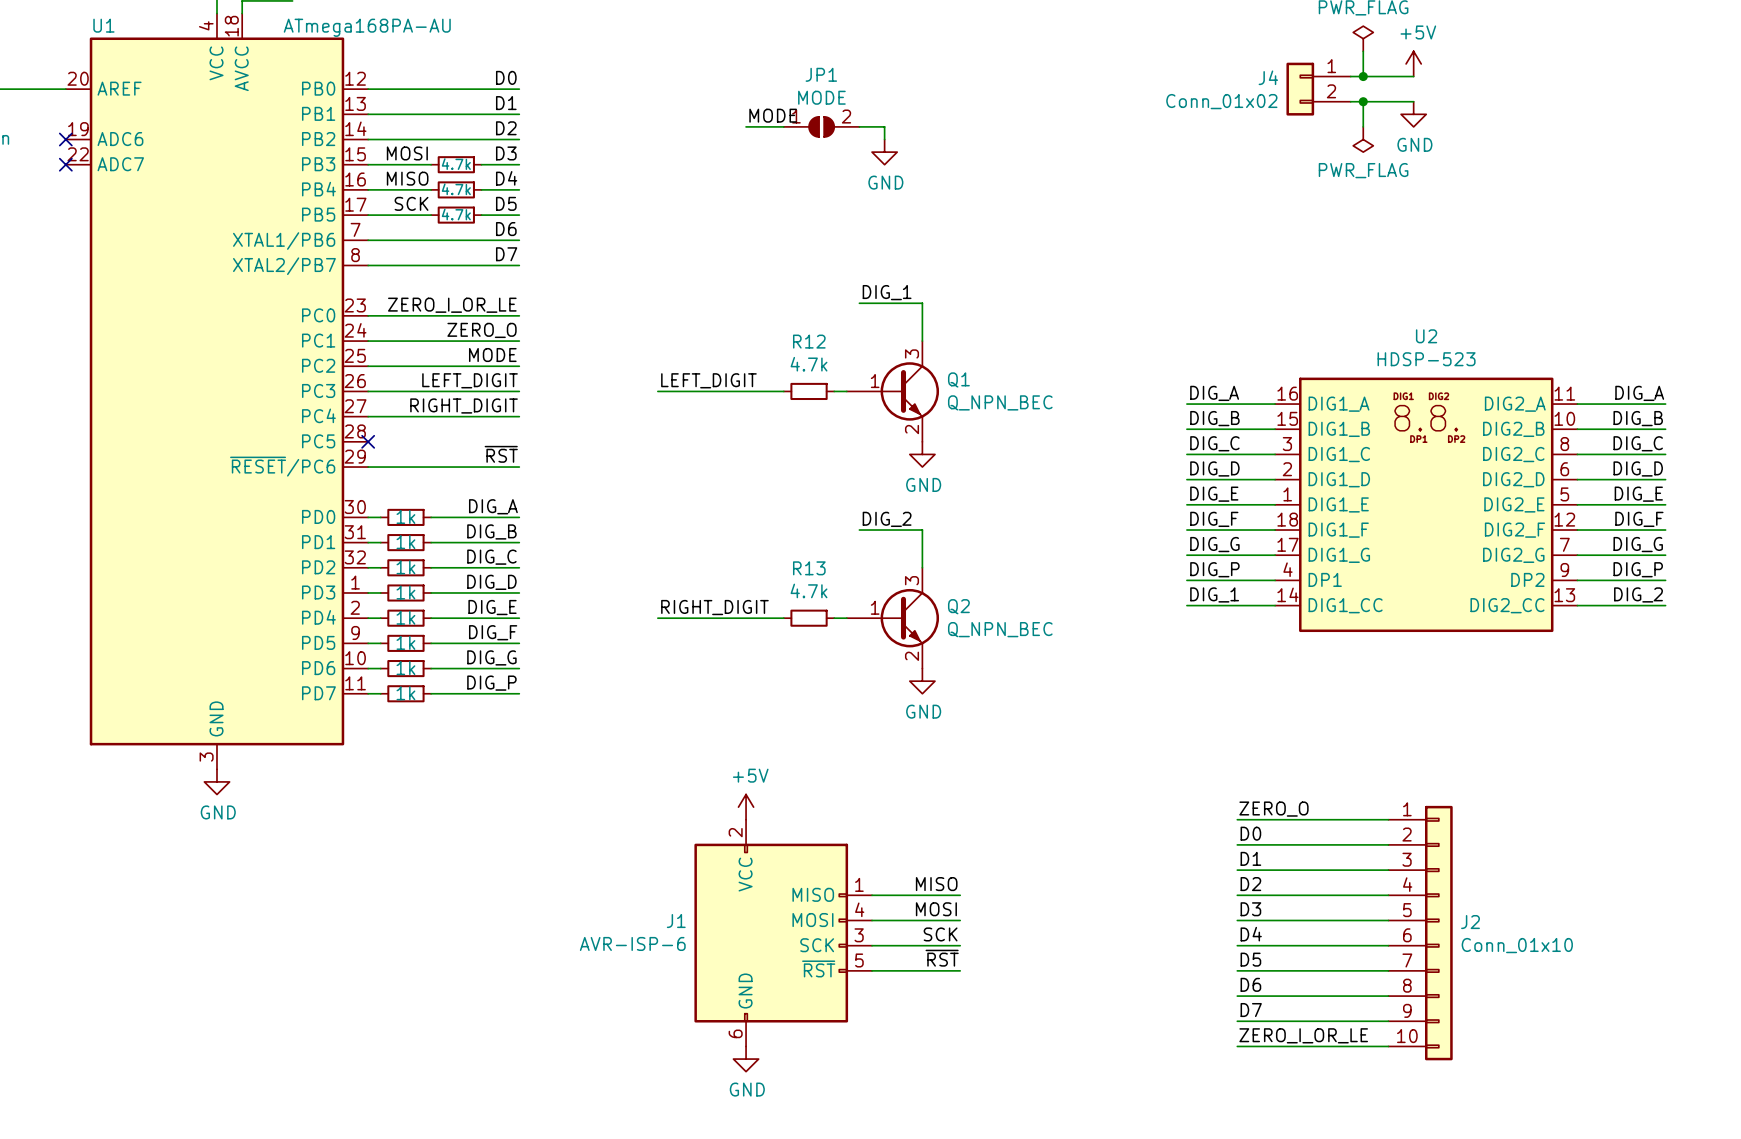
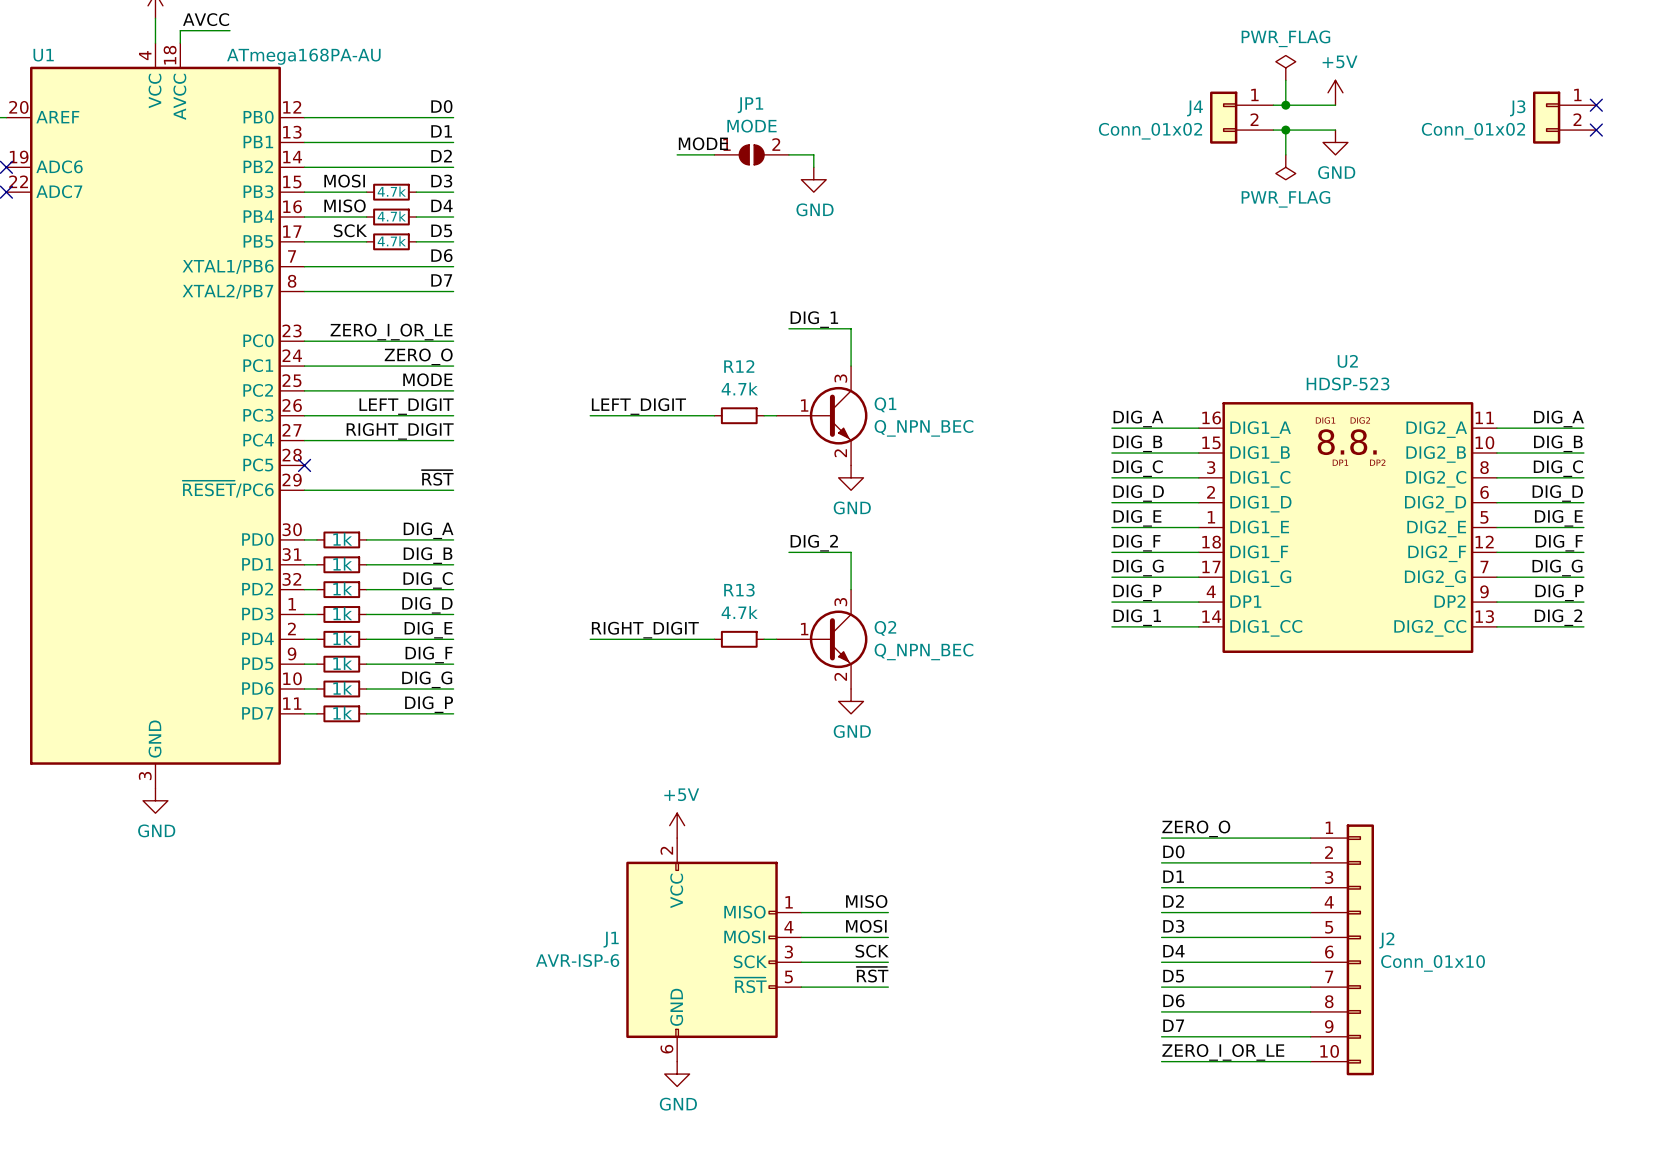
no-connect mark: none -> (1596, 105)
J3: none -> Conn_01x02 (1564, 117)
no-connect mark: none -> (1596, 130)

